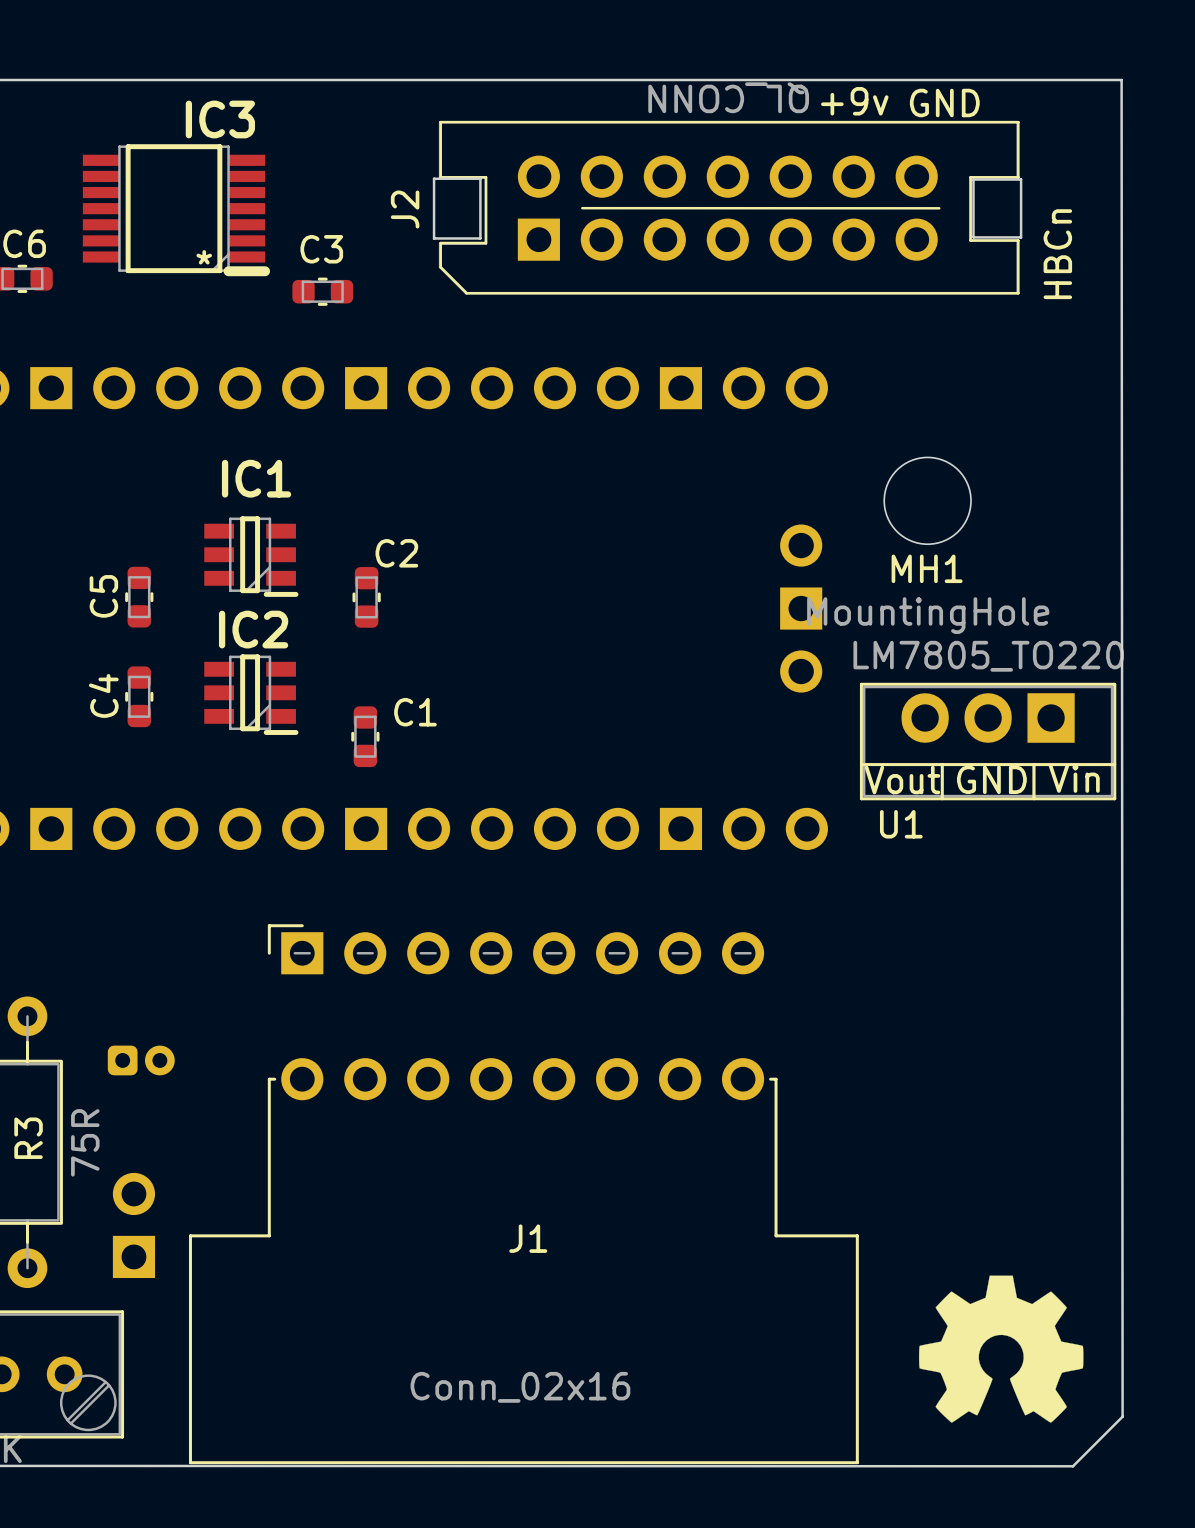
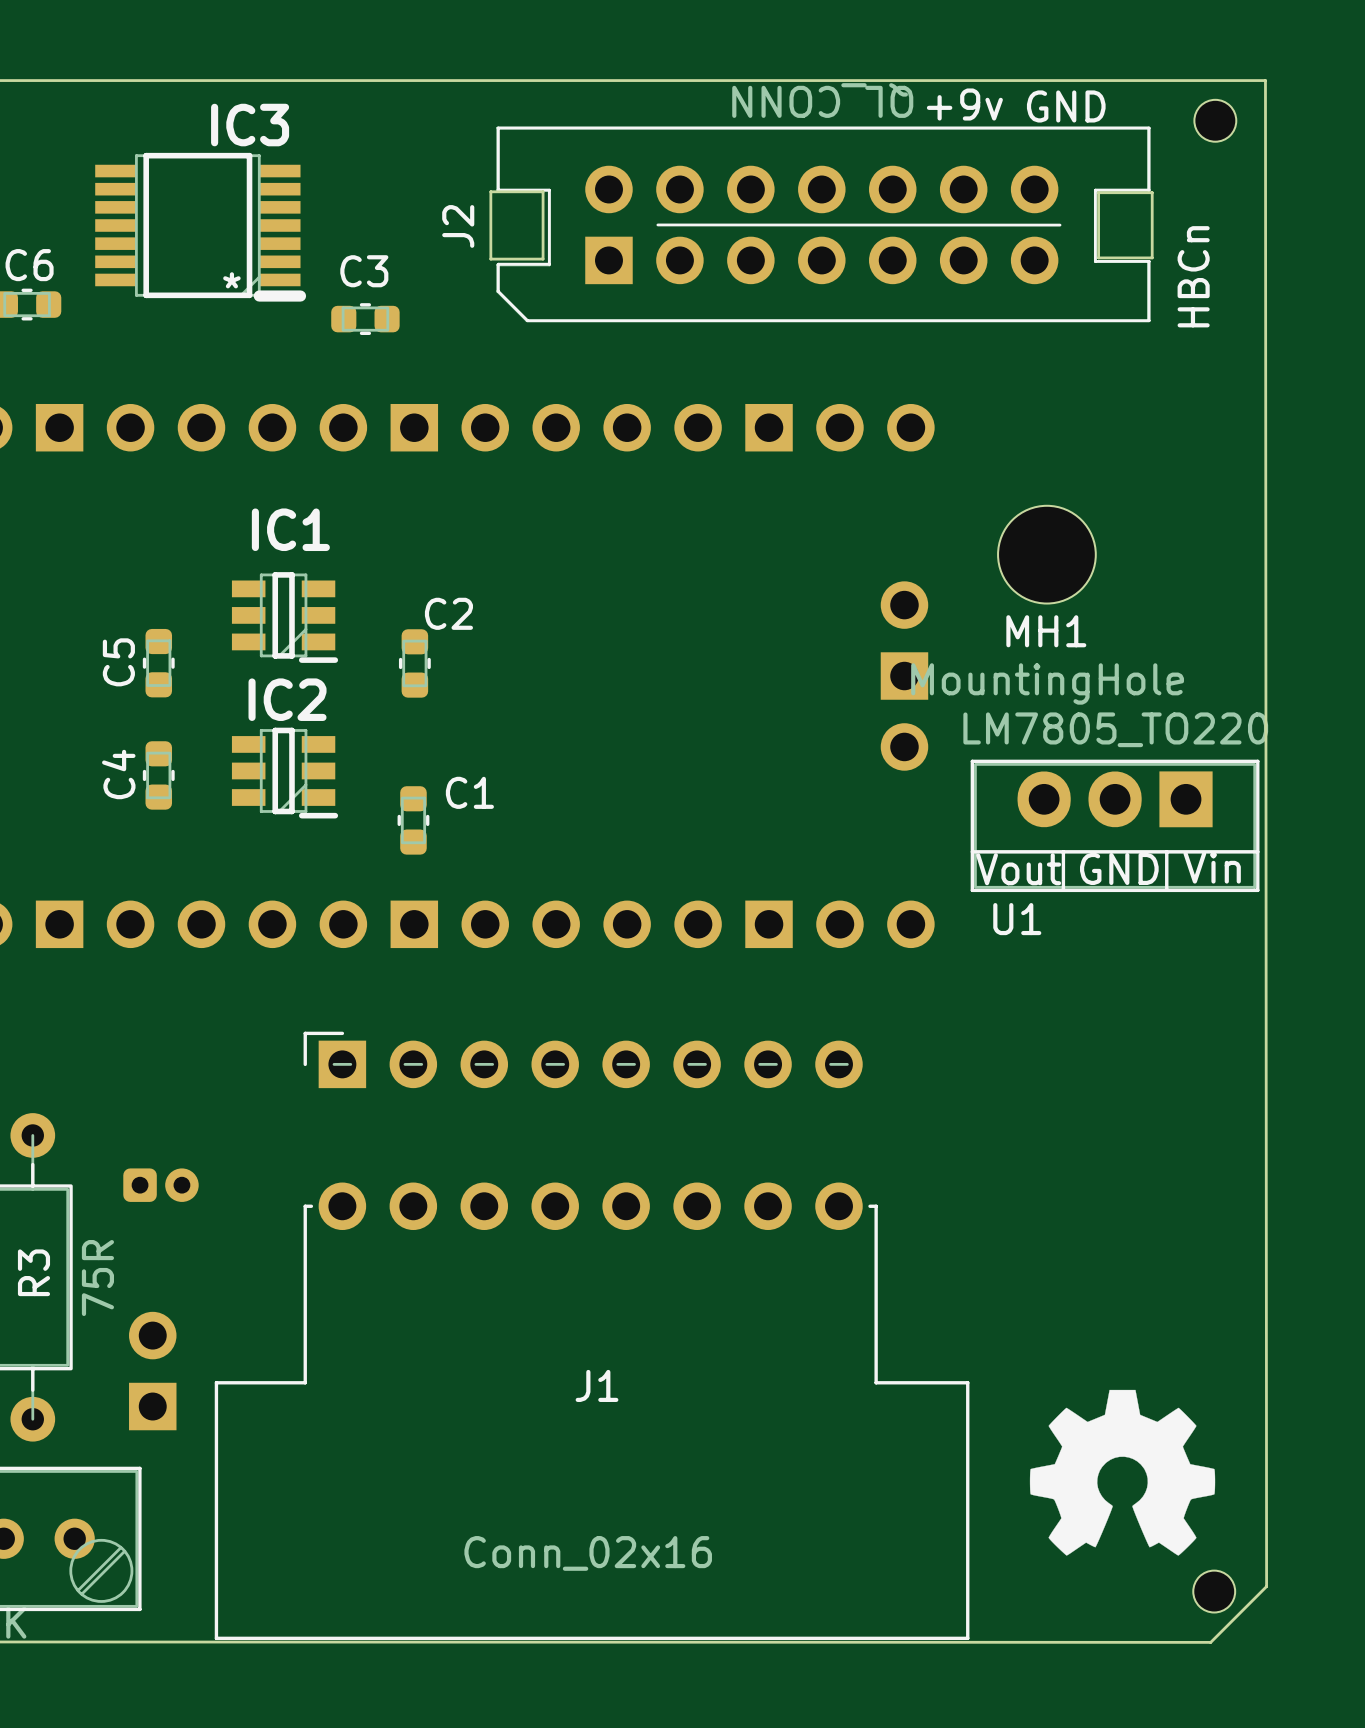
part: none -> (1215, 120)
drawing position: (1001, 1349) -> (1122, 1472)
part: none -> (1214, 1591)

